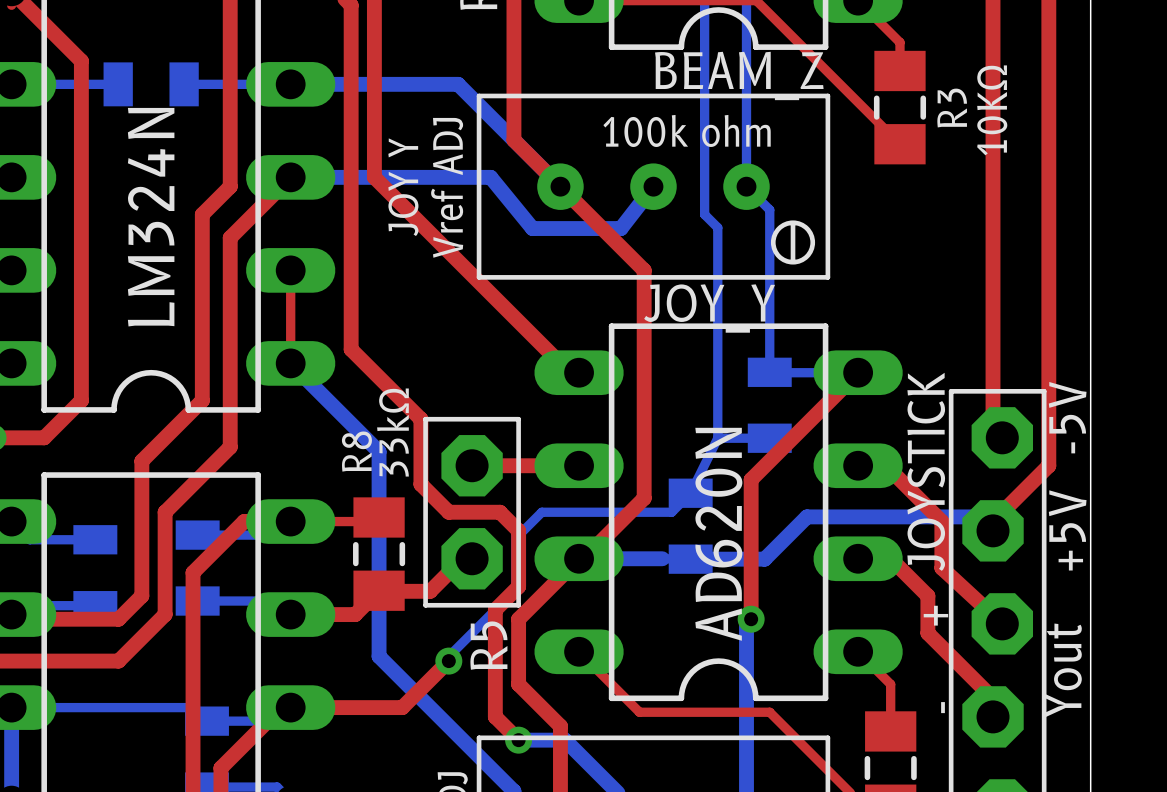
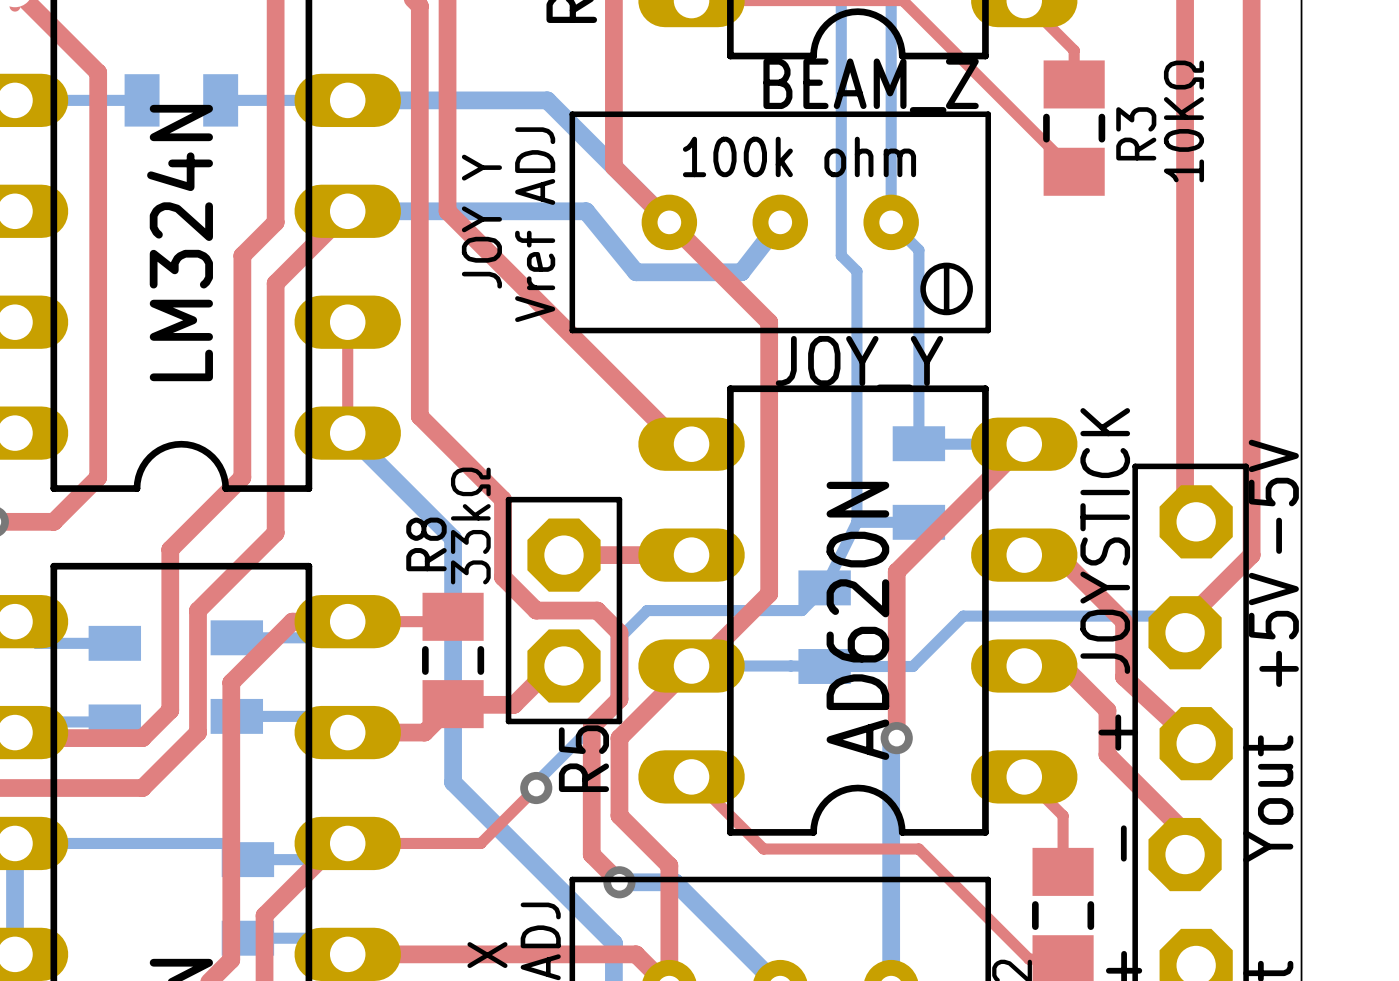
bottom track width: thick (993, 530) (983, 516) (806, 516) (764, 559) (690, 559) -> thin (1185, 632) (1173, 616) (963, 616) (912, 666) (824, 666)
bottom track width: thick (579, 558) (662, 558) -> thin (691, 666) (790, 666)
top track width: thick (448, 661) (402, 707) (290, 707) -> thin (536, 788) (480, 843) (347, 843)

